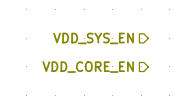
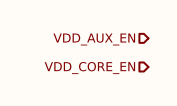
hierarchical label: VDD_SYS_EN (93, 38) -> VDD_AUX_EN (94, 39)

